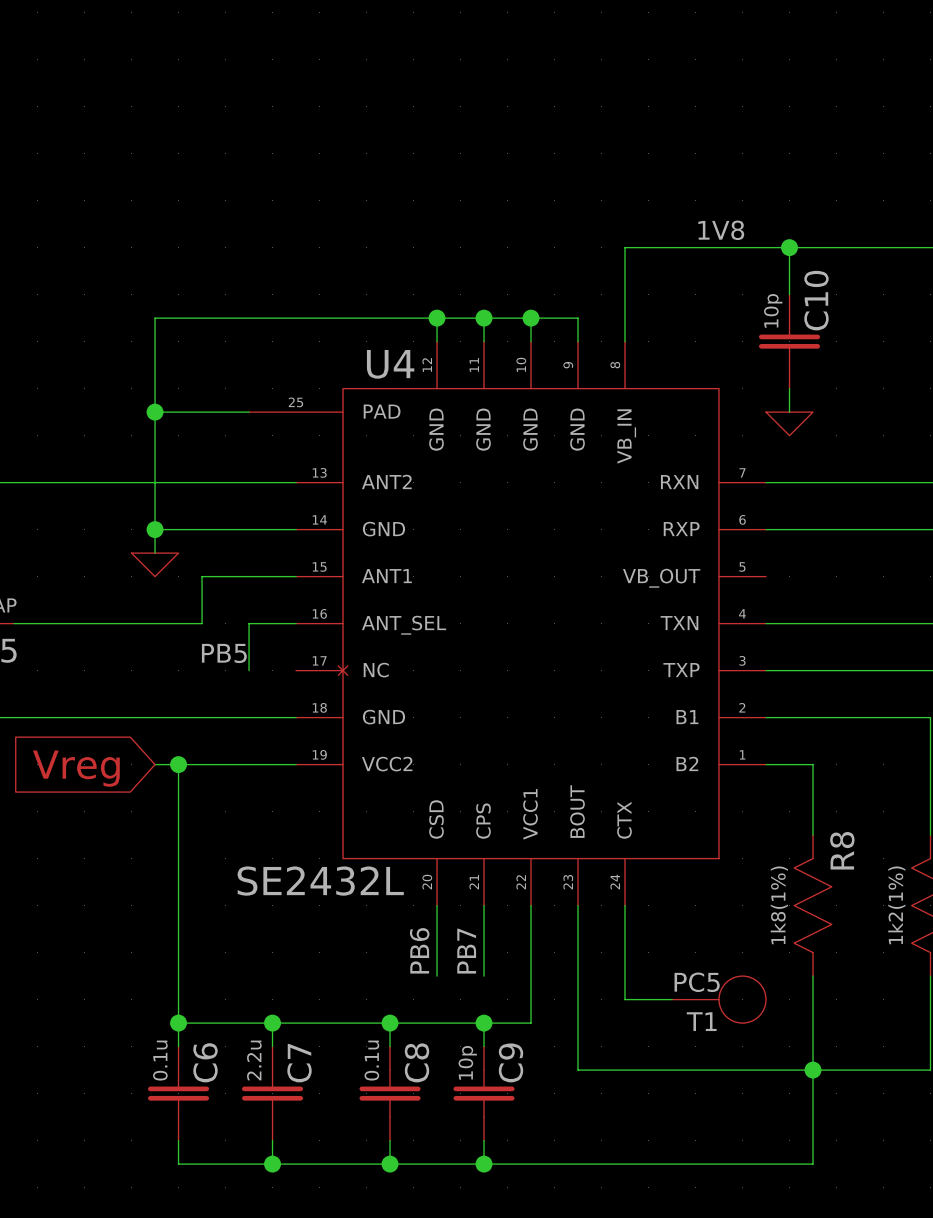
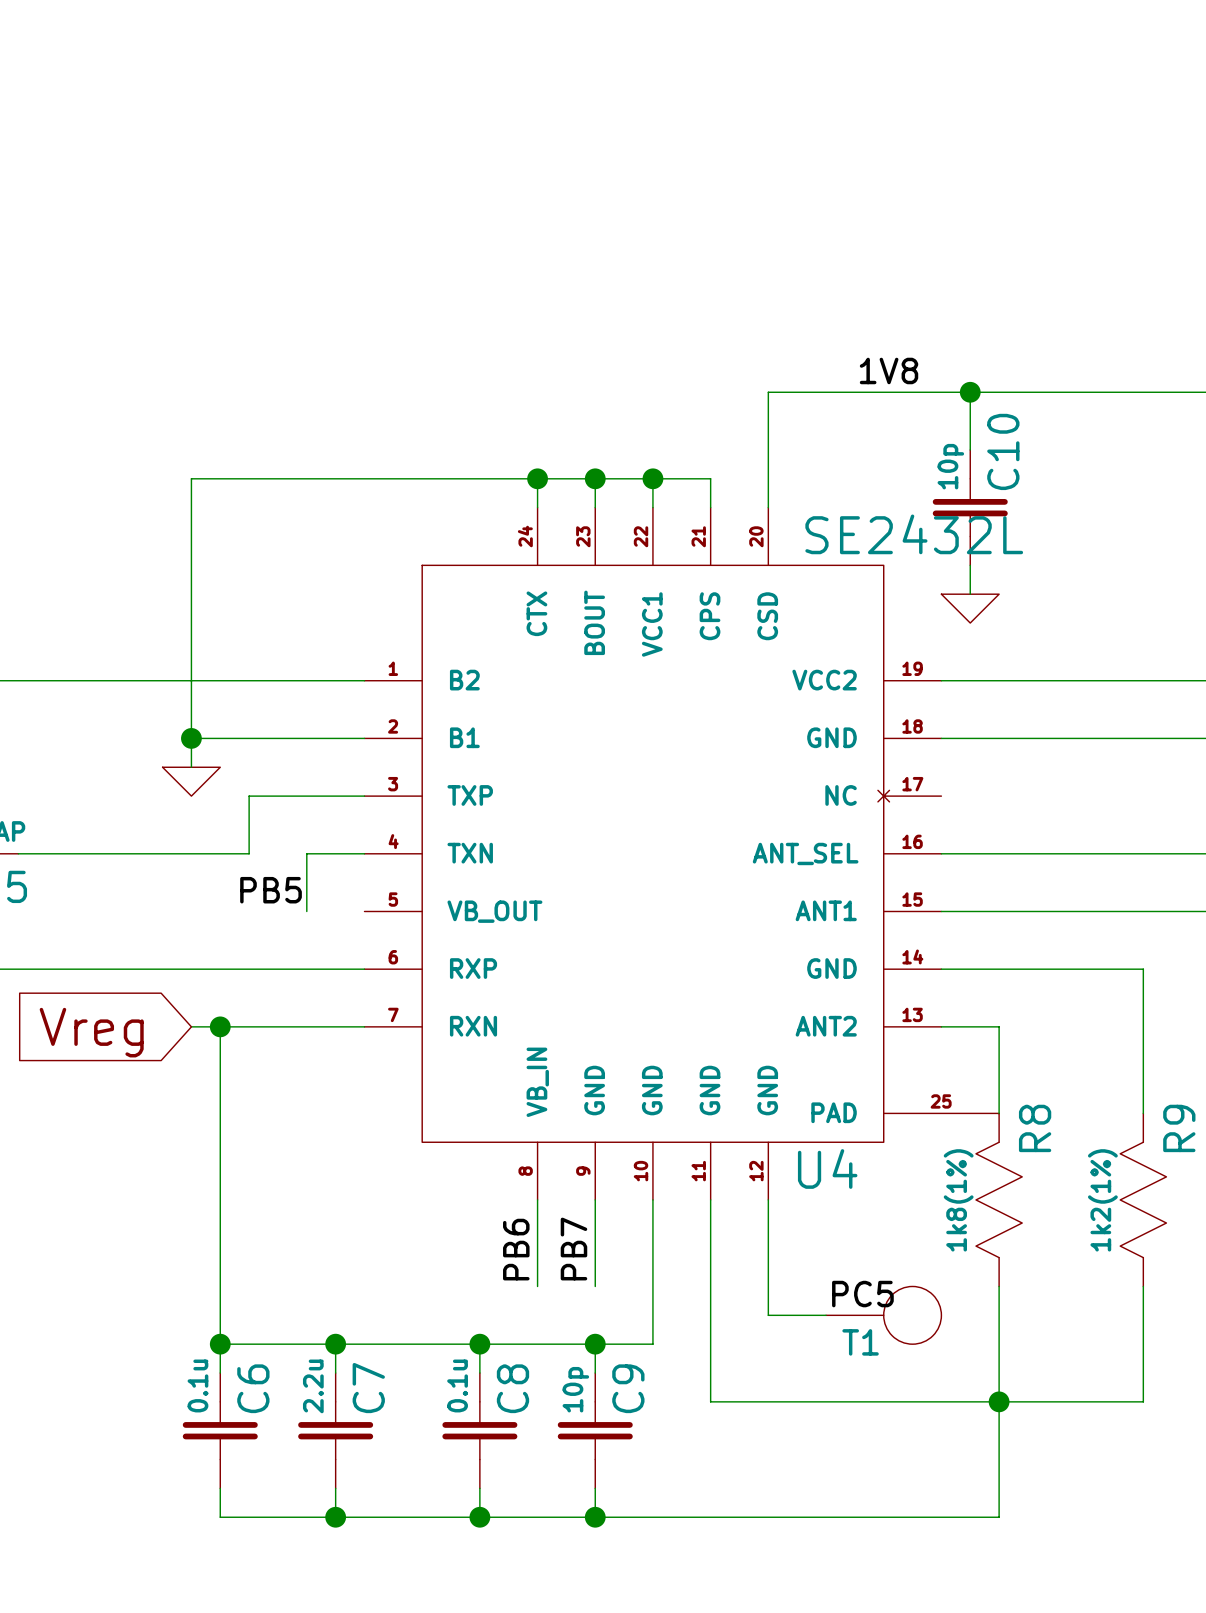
wire: (155, 412) (249, 412) -> none
junction: (155, 412) -> none
U4 rotation: 0° (531, 623) -> 180° (652, 853)

